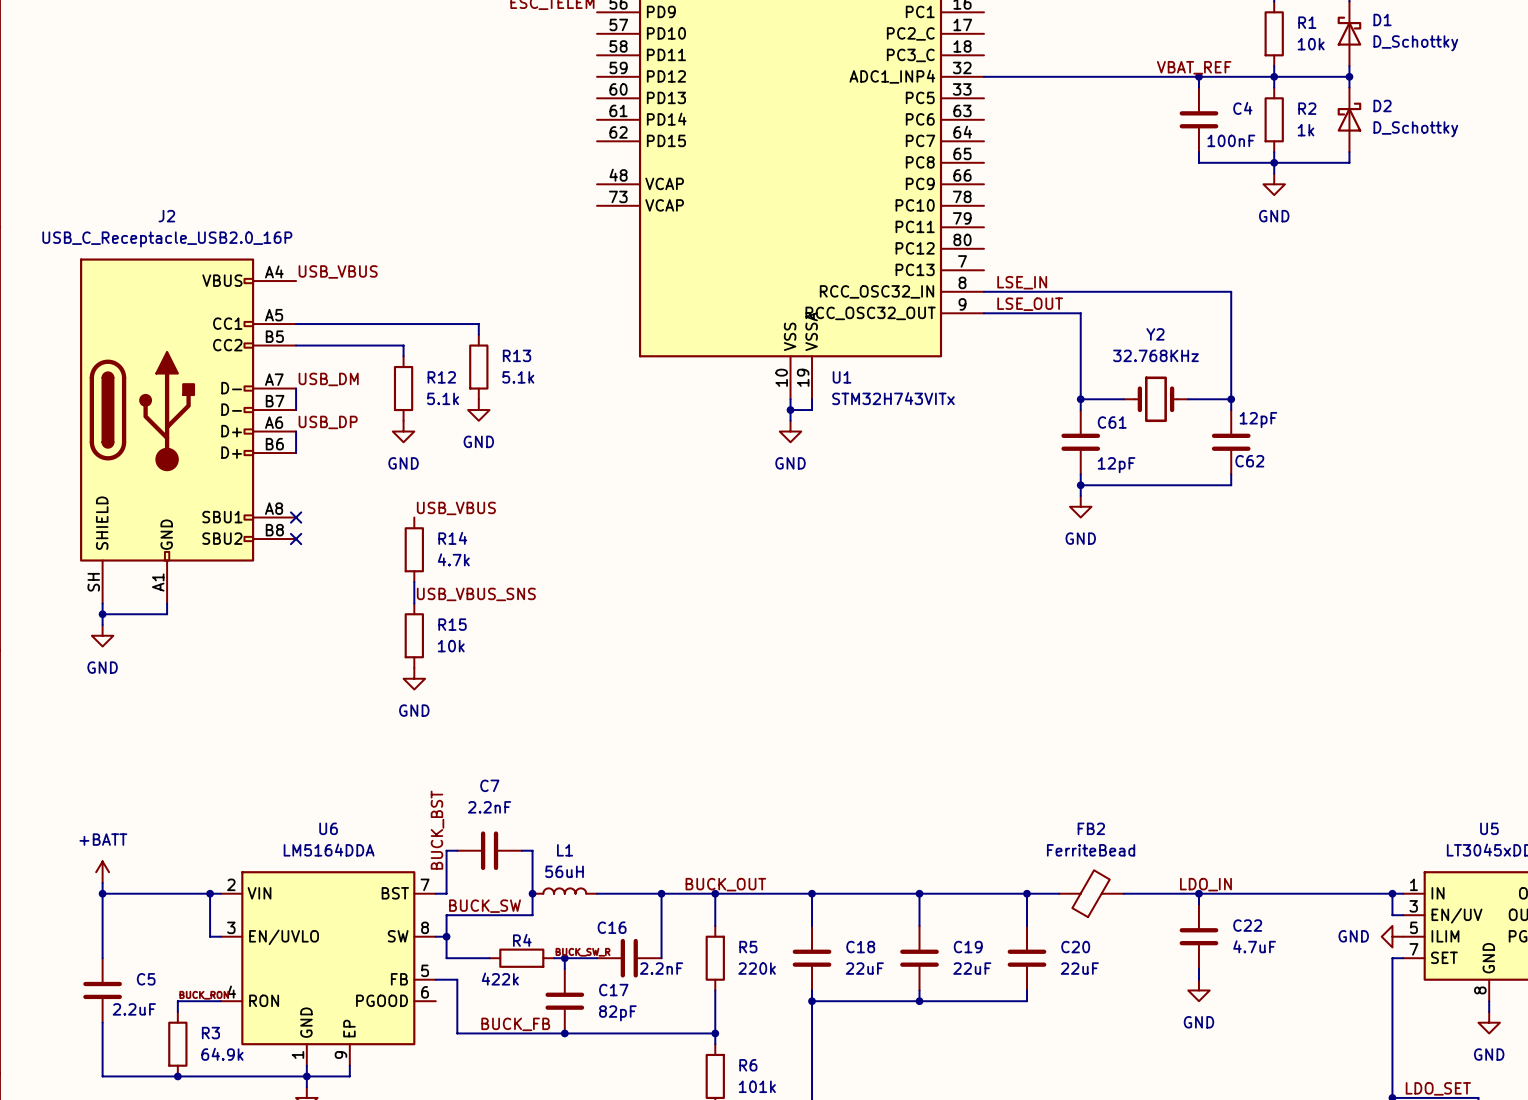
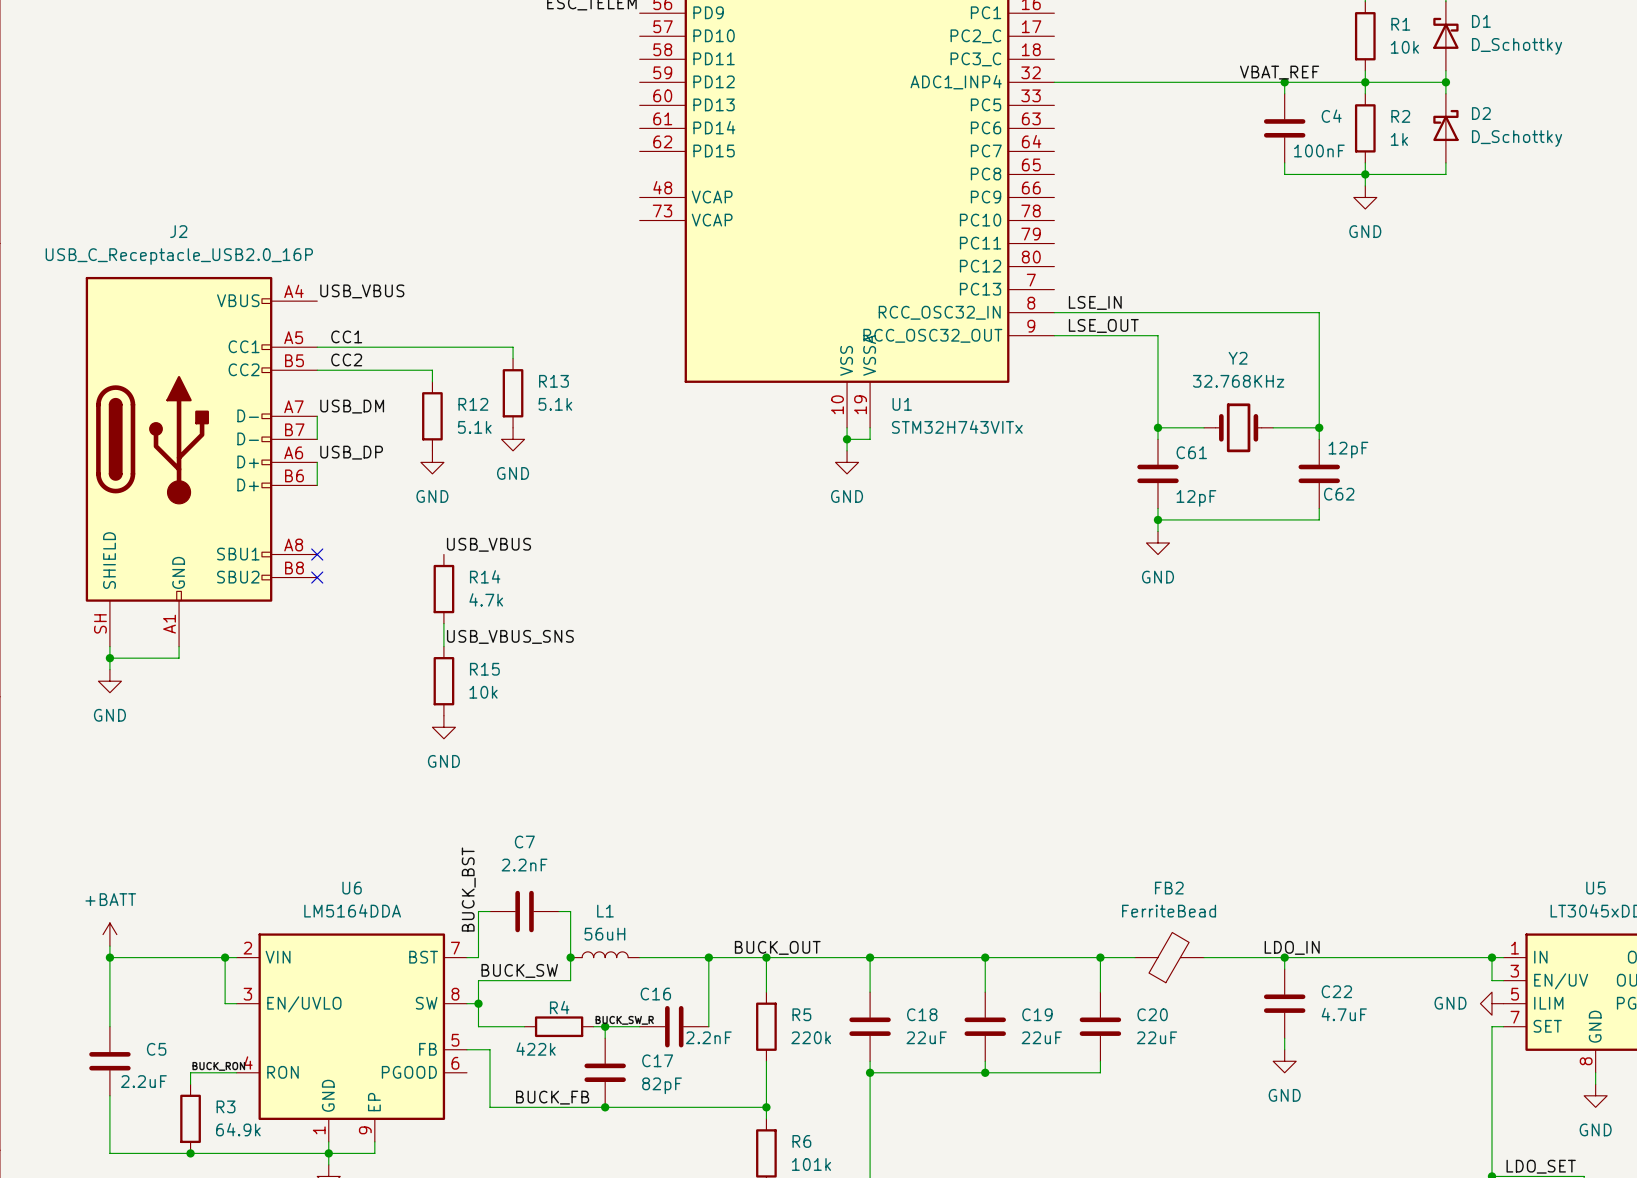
label: none -> CC1 (346, 336)
label: none -> CC2 (346, 359)

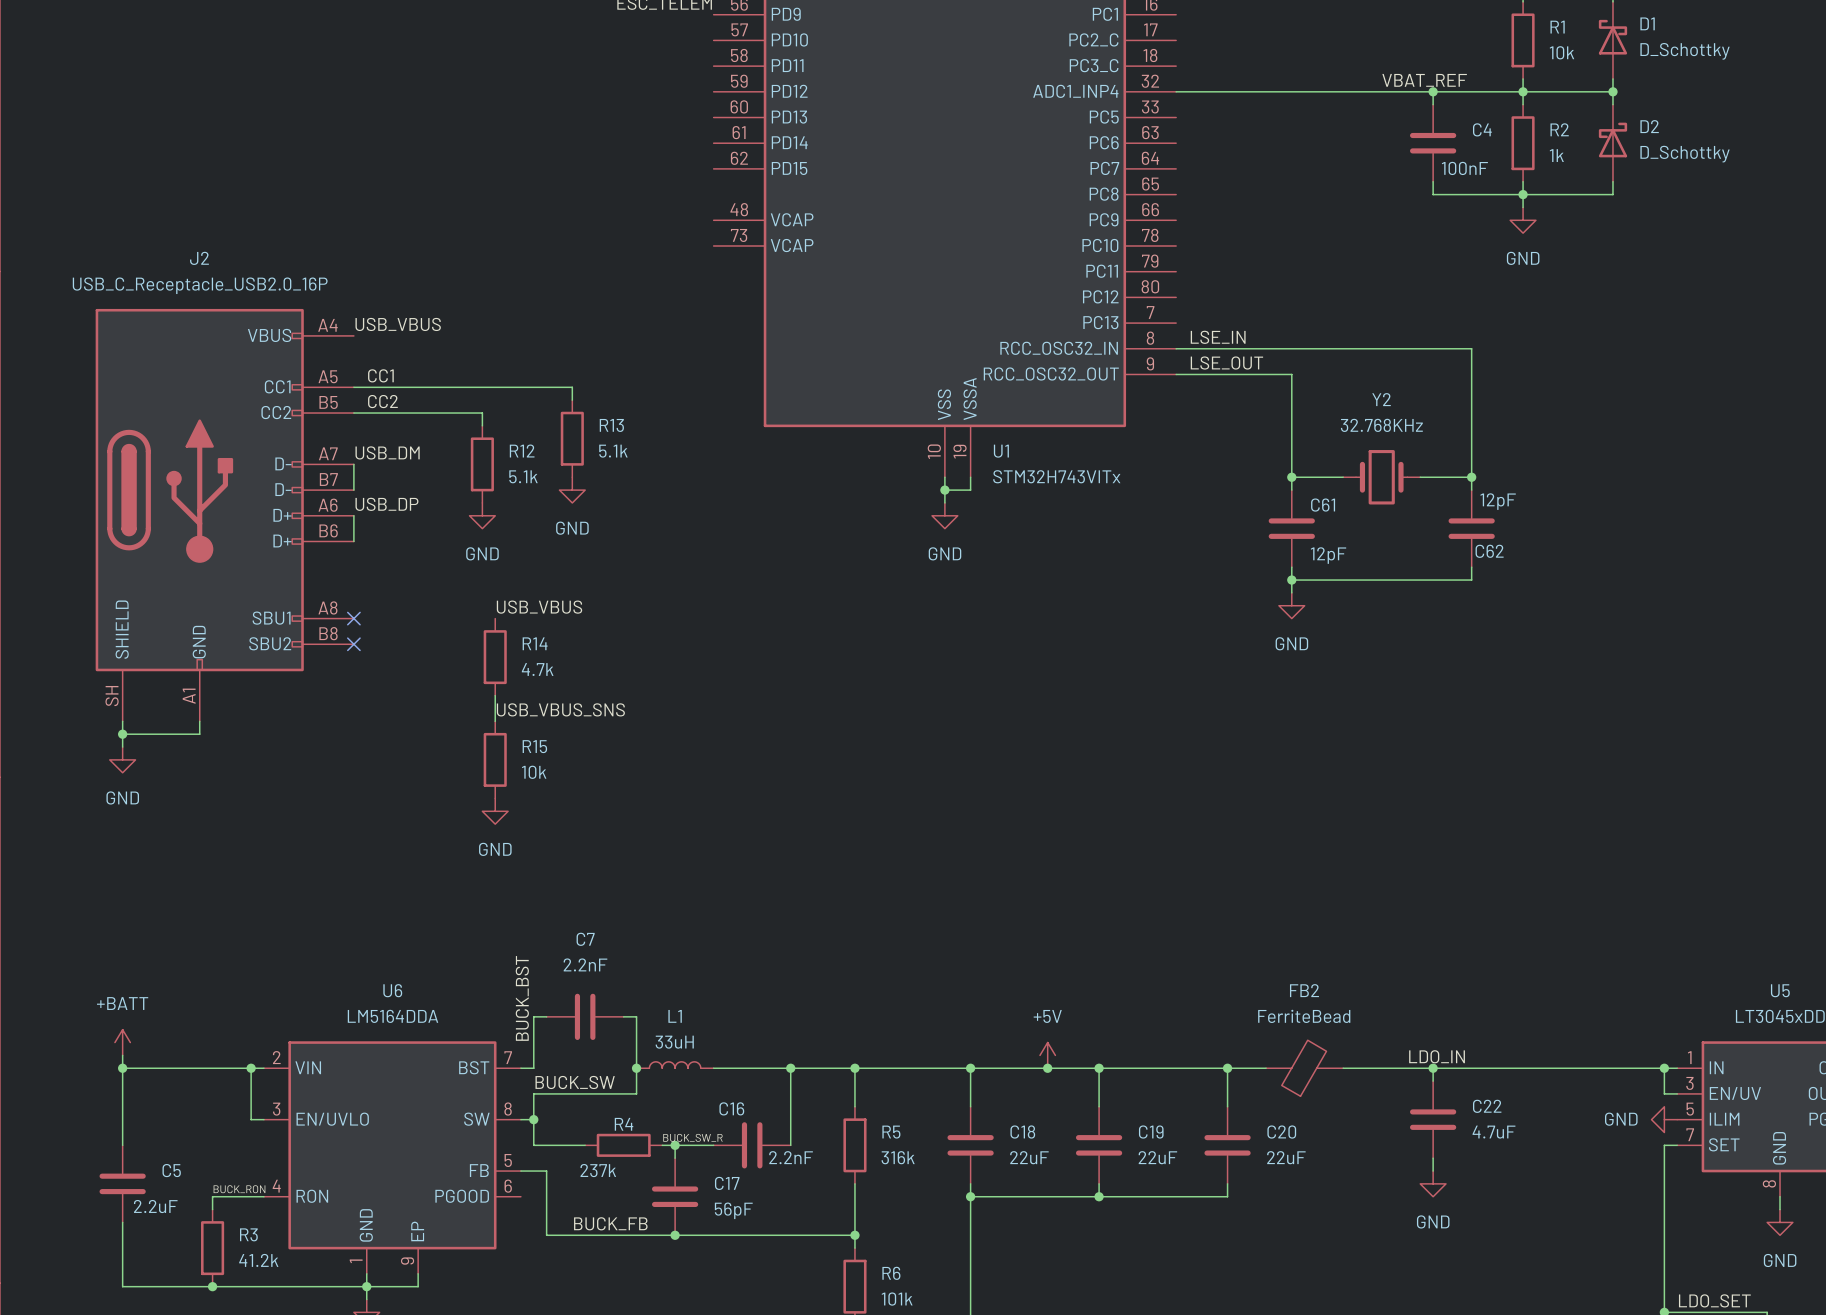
L1 value: 56uH (604, 934) -> 33uH (674, 1042)
power symbol: none -> +5V (1047, 1055)
label: BUCK_OUT (777, 947) -> none
junction: none -> (1047, 1068)
R5 value: 220k (811, 1037) -> 316k (898, 1157)
R4 value: 422k (536, 1049) -> 237k (598, 1170)
C17 value: 82pF (662, 1085) -> 56pF (733, 1210)
R3 value: 64.9k (238, 1129) -> 41.2k (258, 1260)

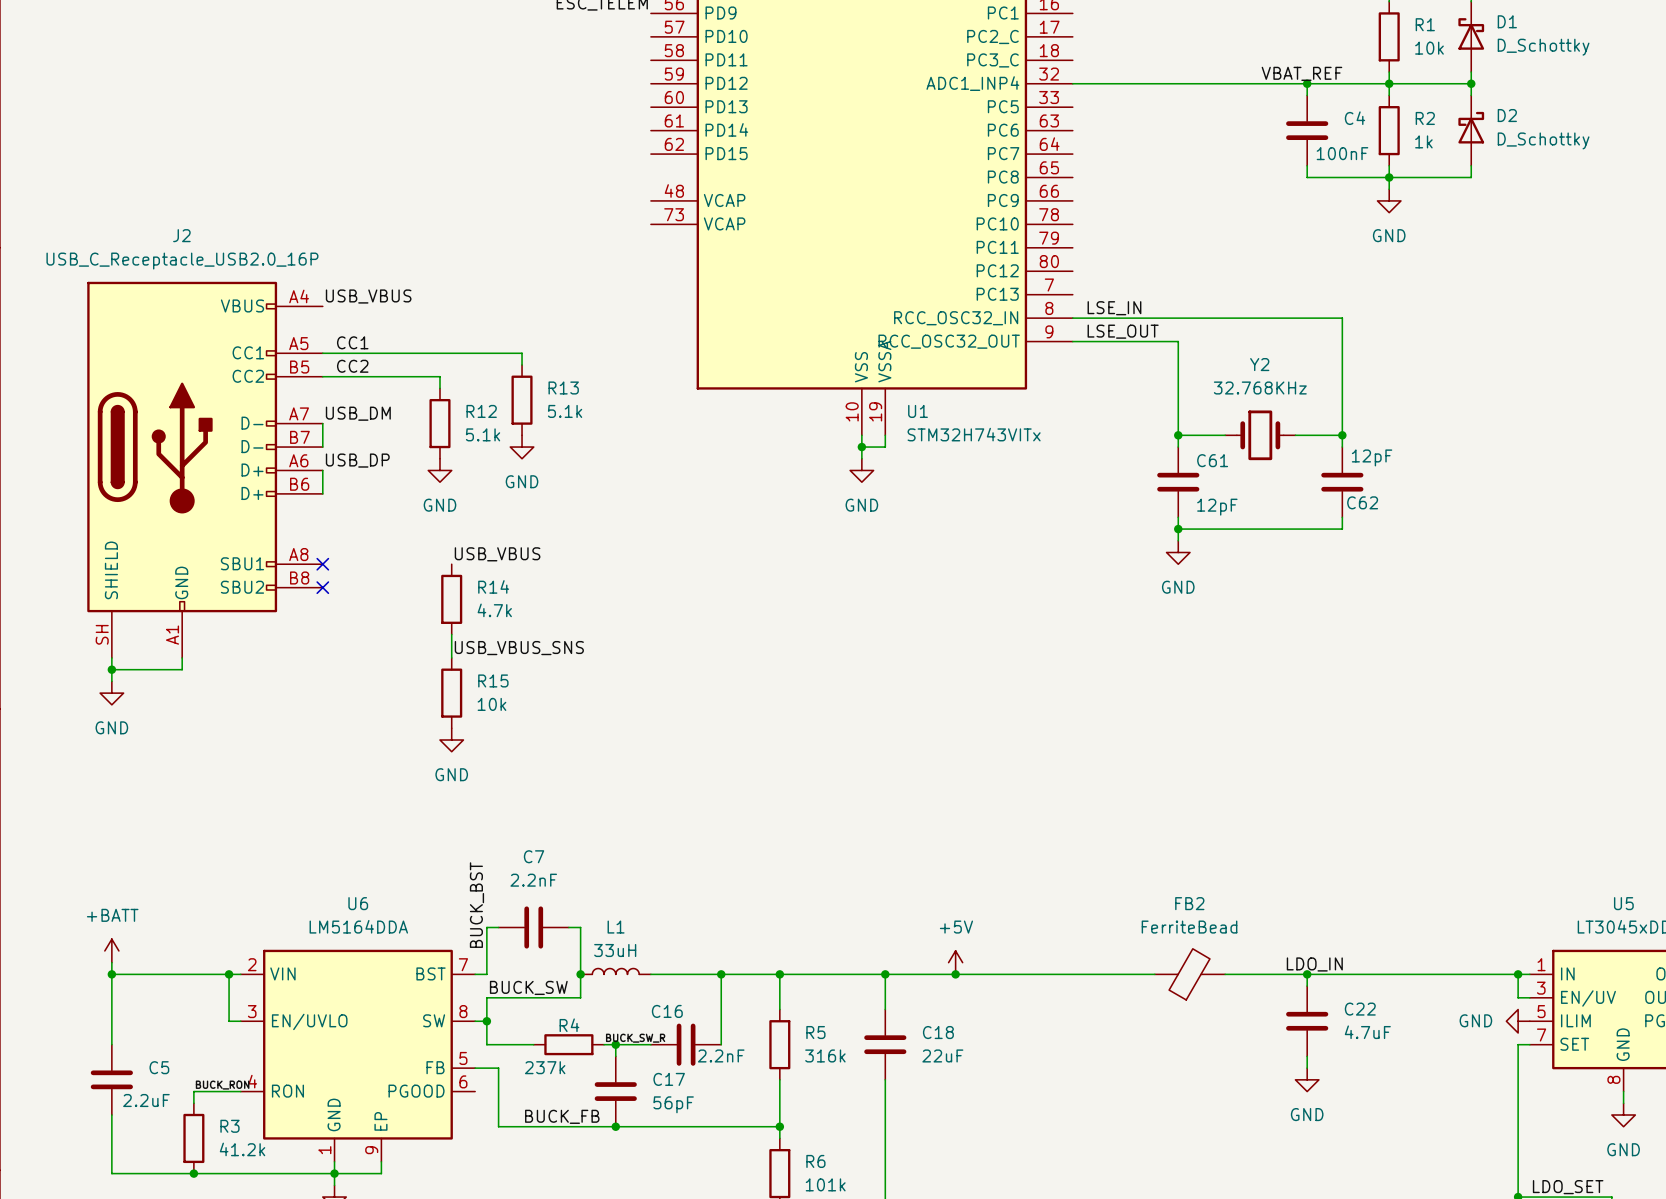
wire: (1099, 1068) (1099, 1106) -> none
junction: (1099, 1068) -> none
wire: (1227, 1068) (1227, 1106) -> none
junction: (1227, 1068) -> none
C19: 22uF (1099, 1145) -> none
C20: 22uF (1227, 1145) -> none
wire: (1099, 1183) (1099, 1196) -> none
wire: (1227, 1183) (1227, 1196) (970, 1196) -> none
junction: (970, 1196) -> none
junction: (1099, 1196) -> none

